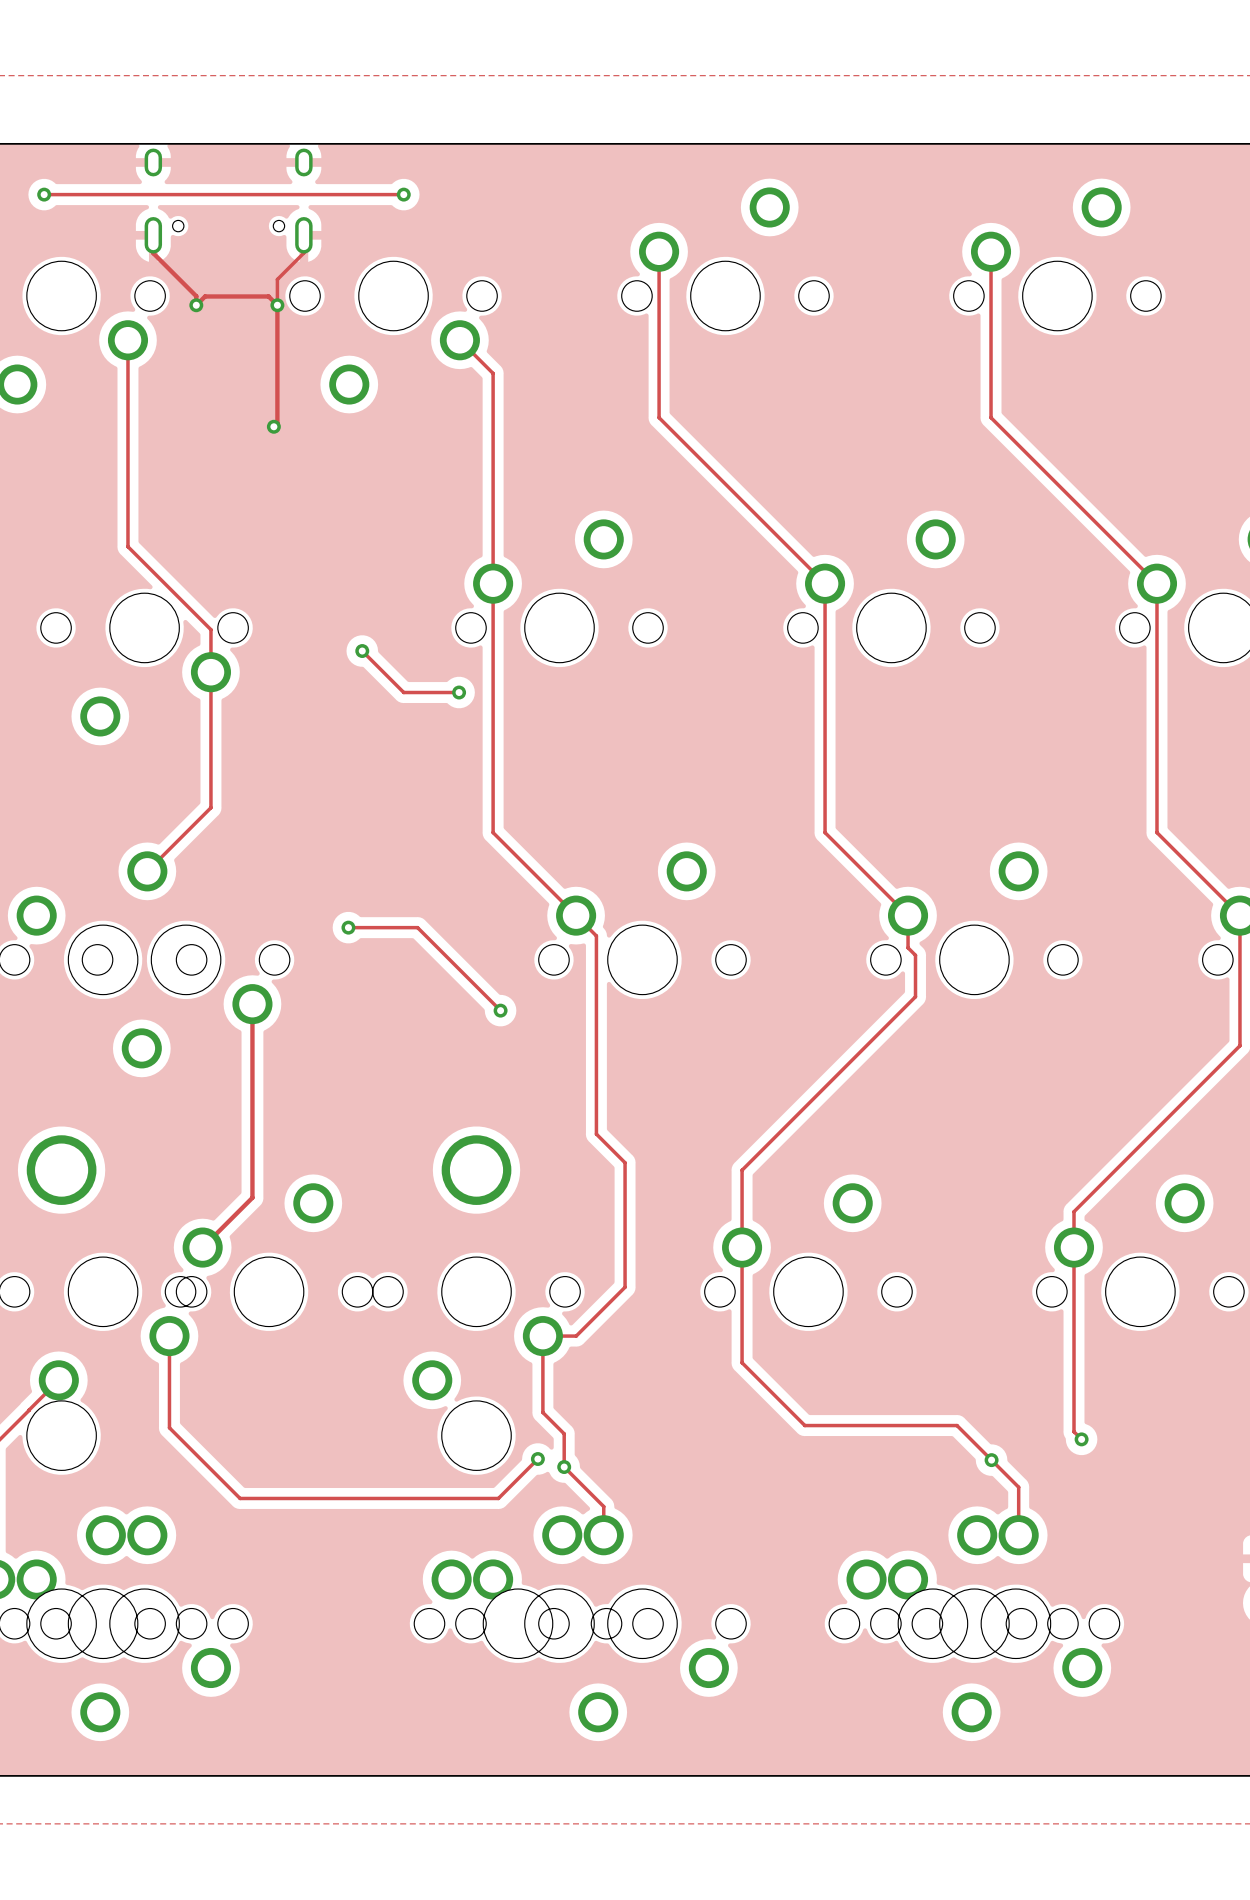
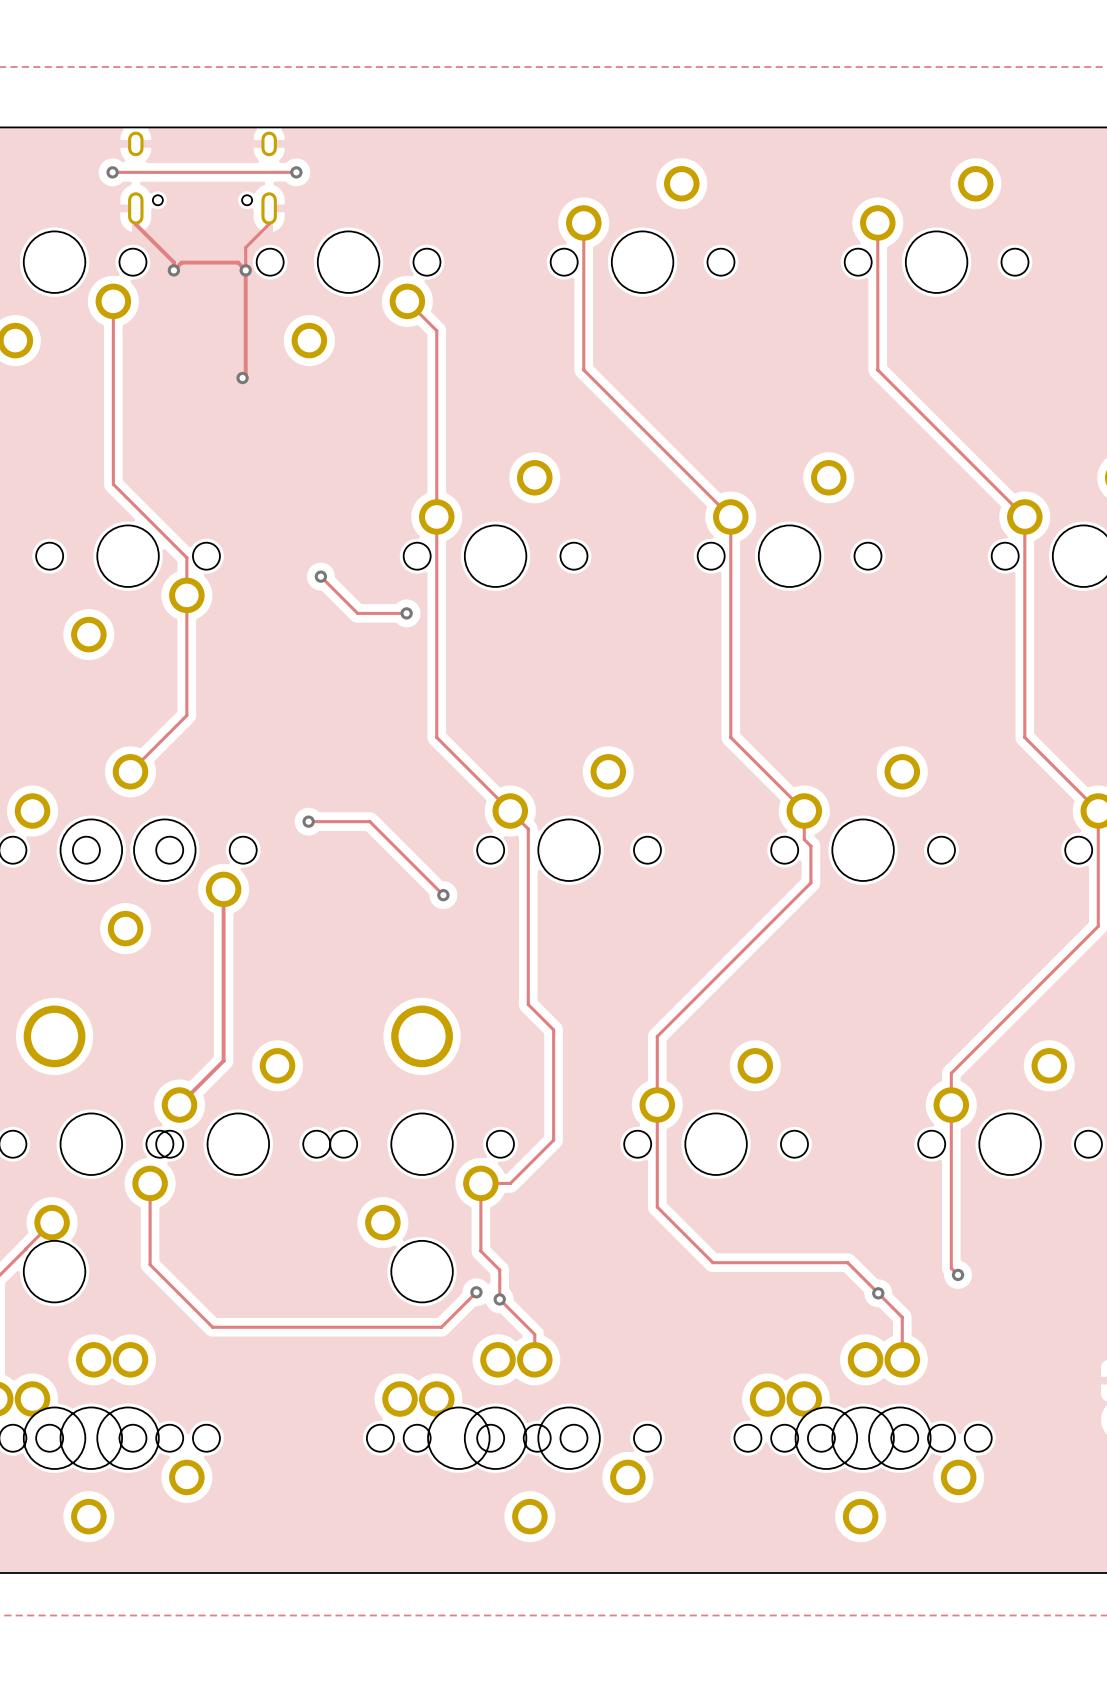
track: (44, 194) (127, 194) -> none
via position: (44, 194) -> (112, 172)
track: (334, 194) (403, 194) -> none
via position: (403, 194) -> (296, 172)

